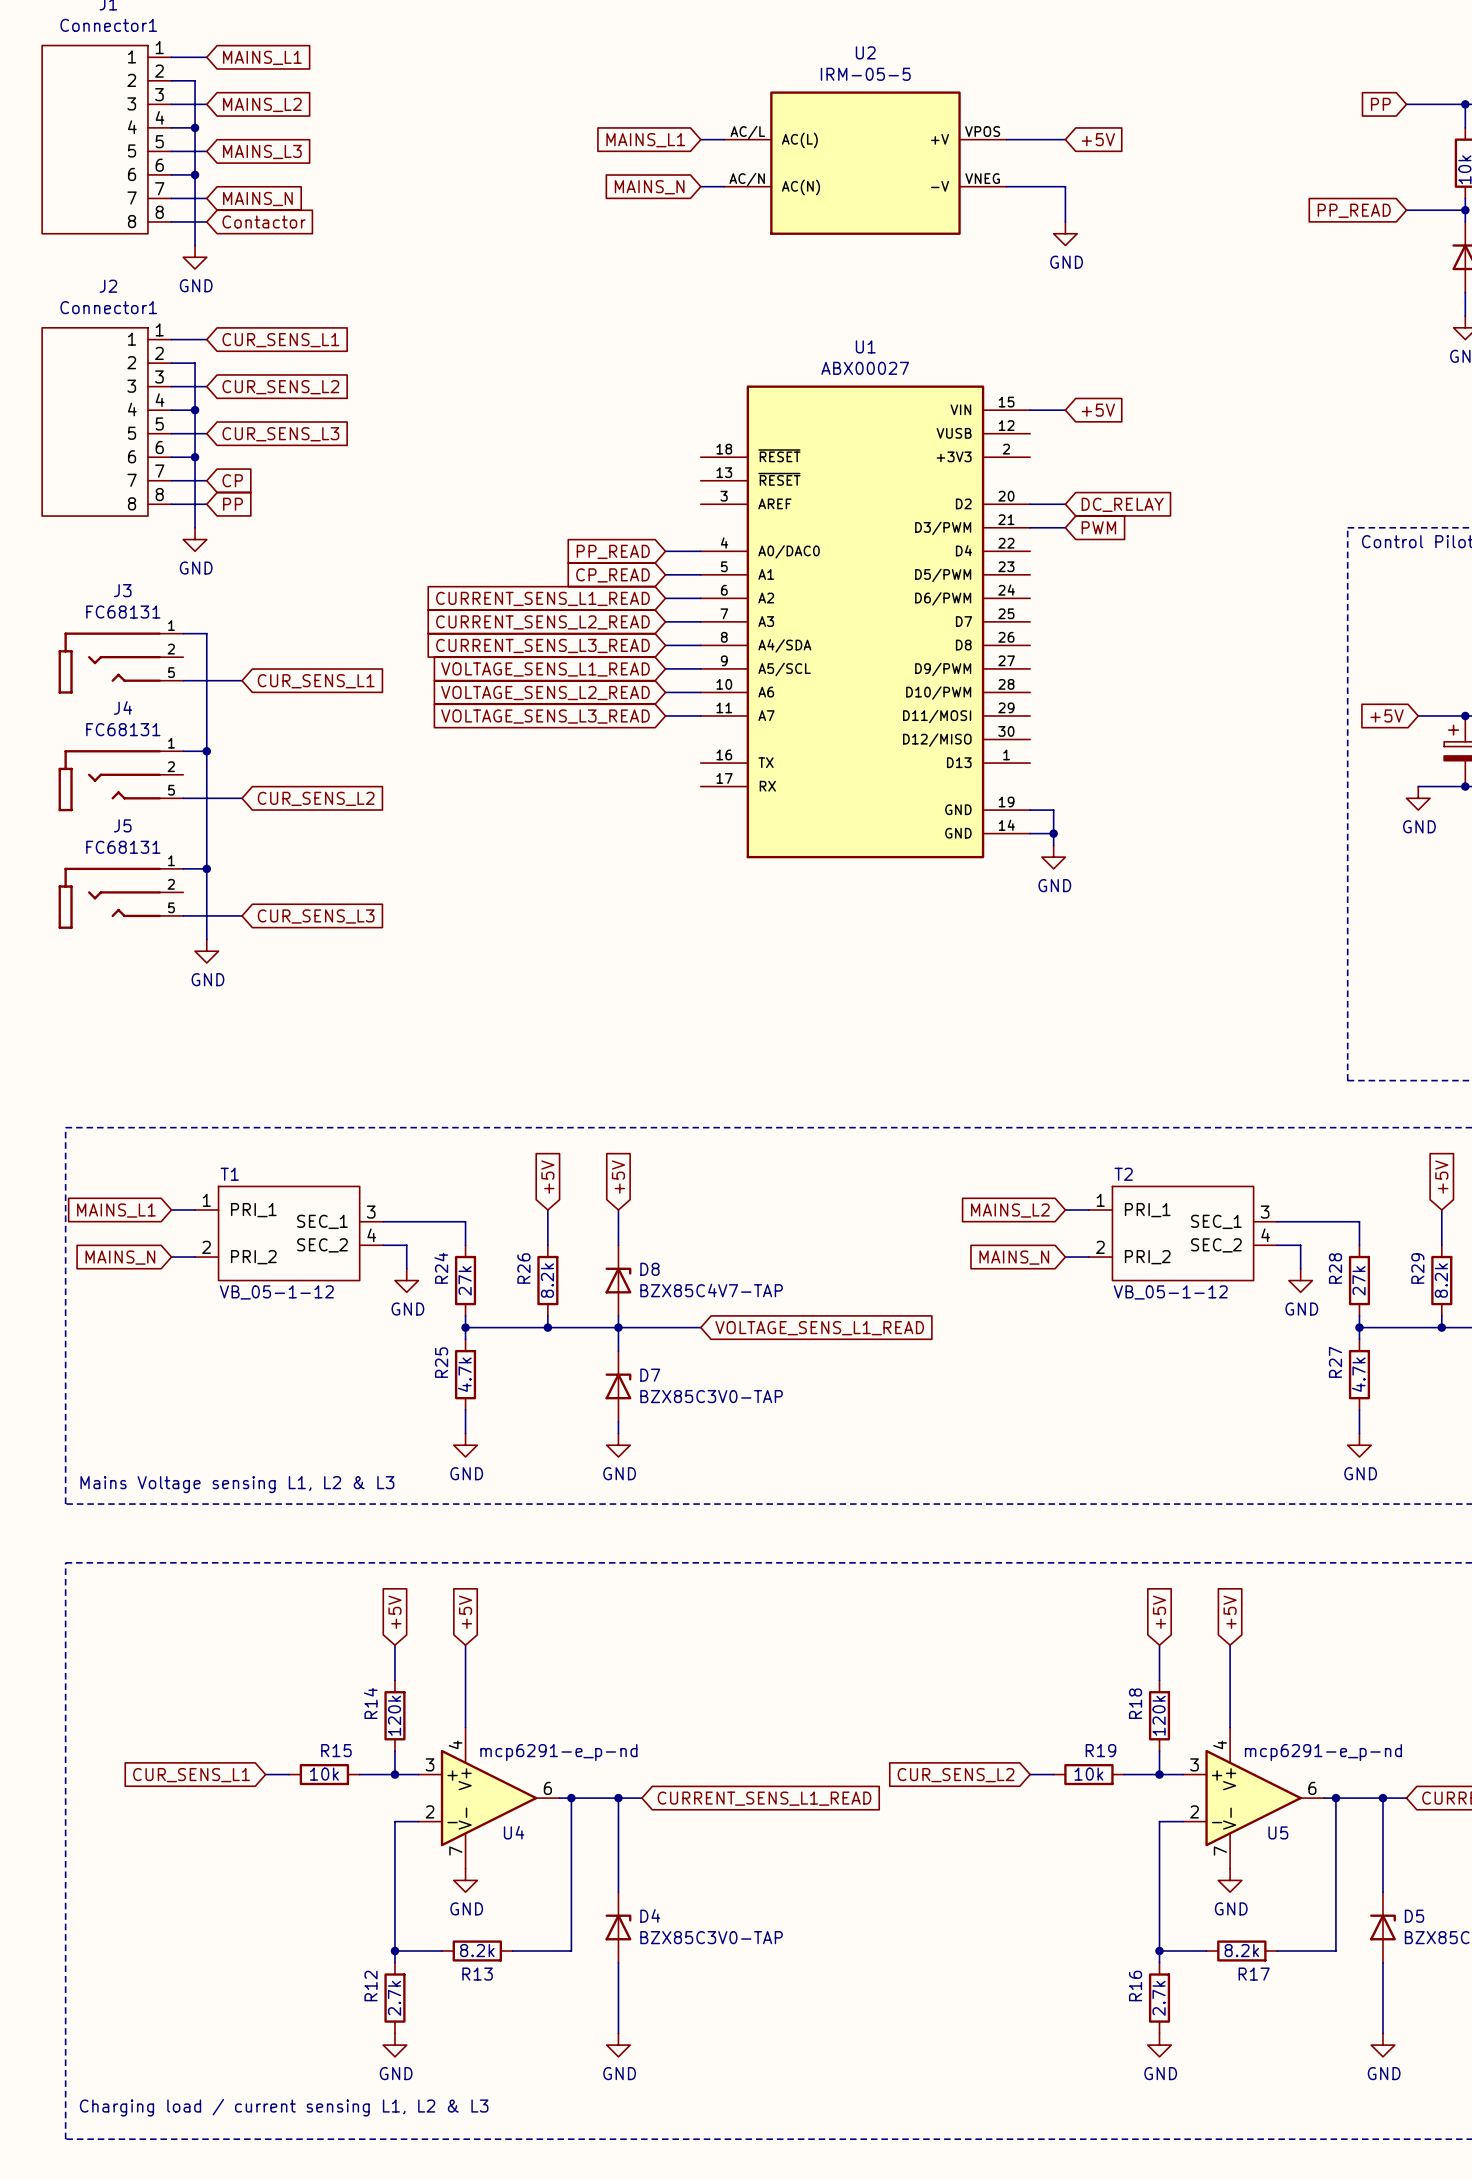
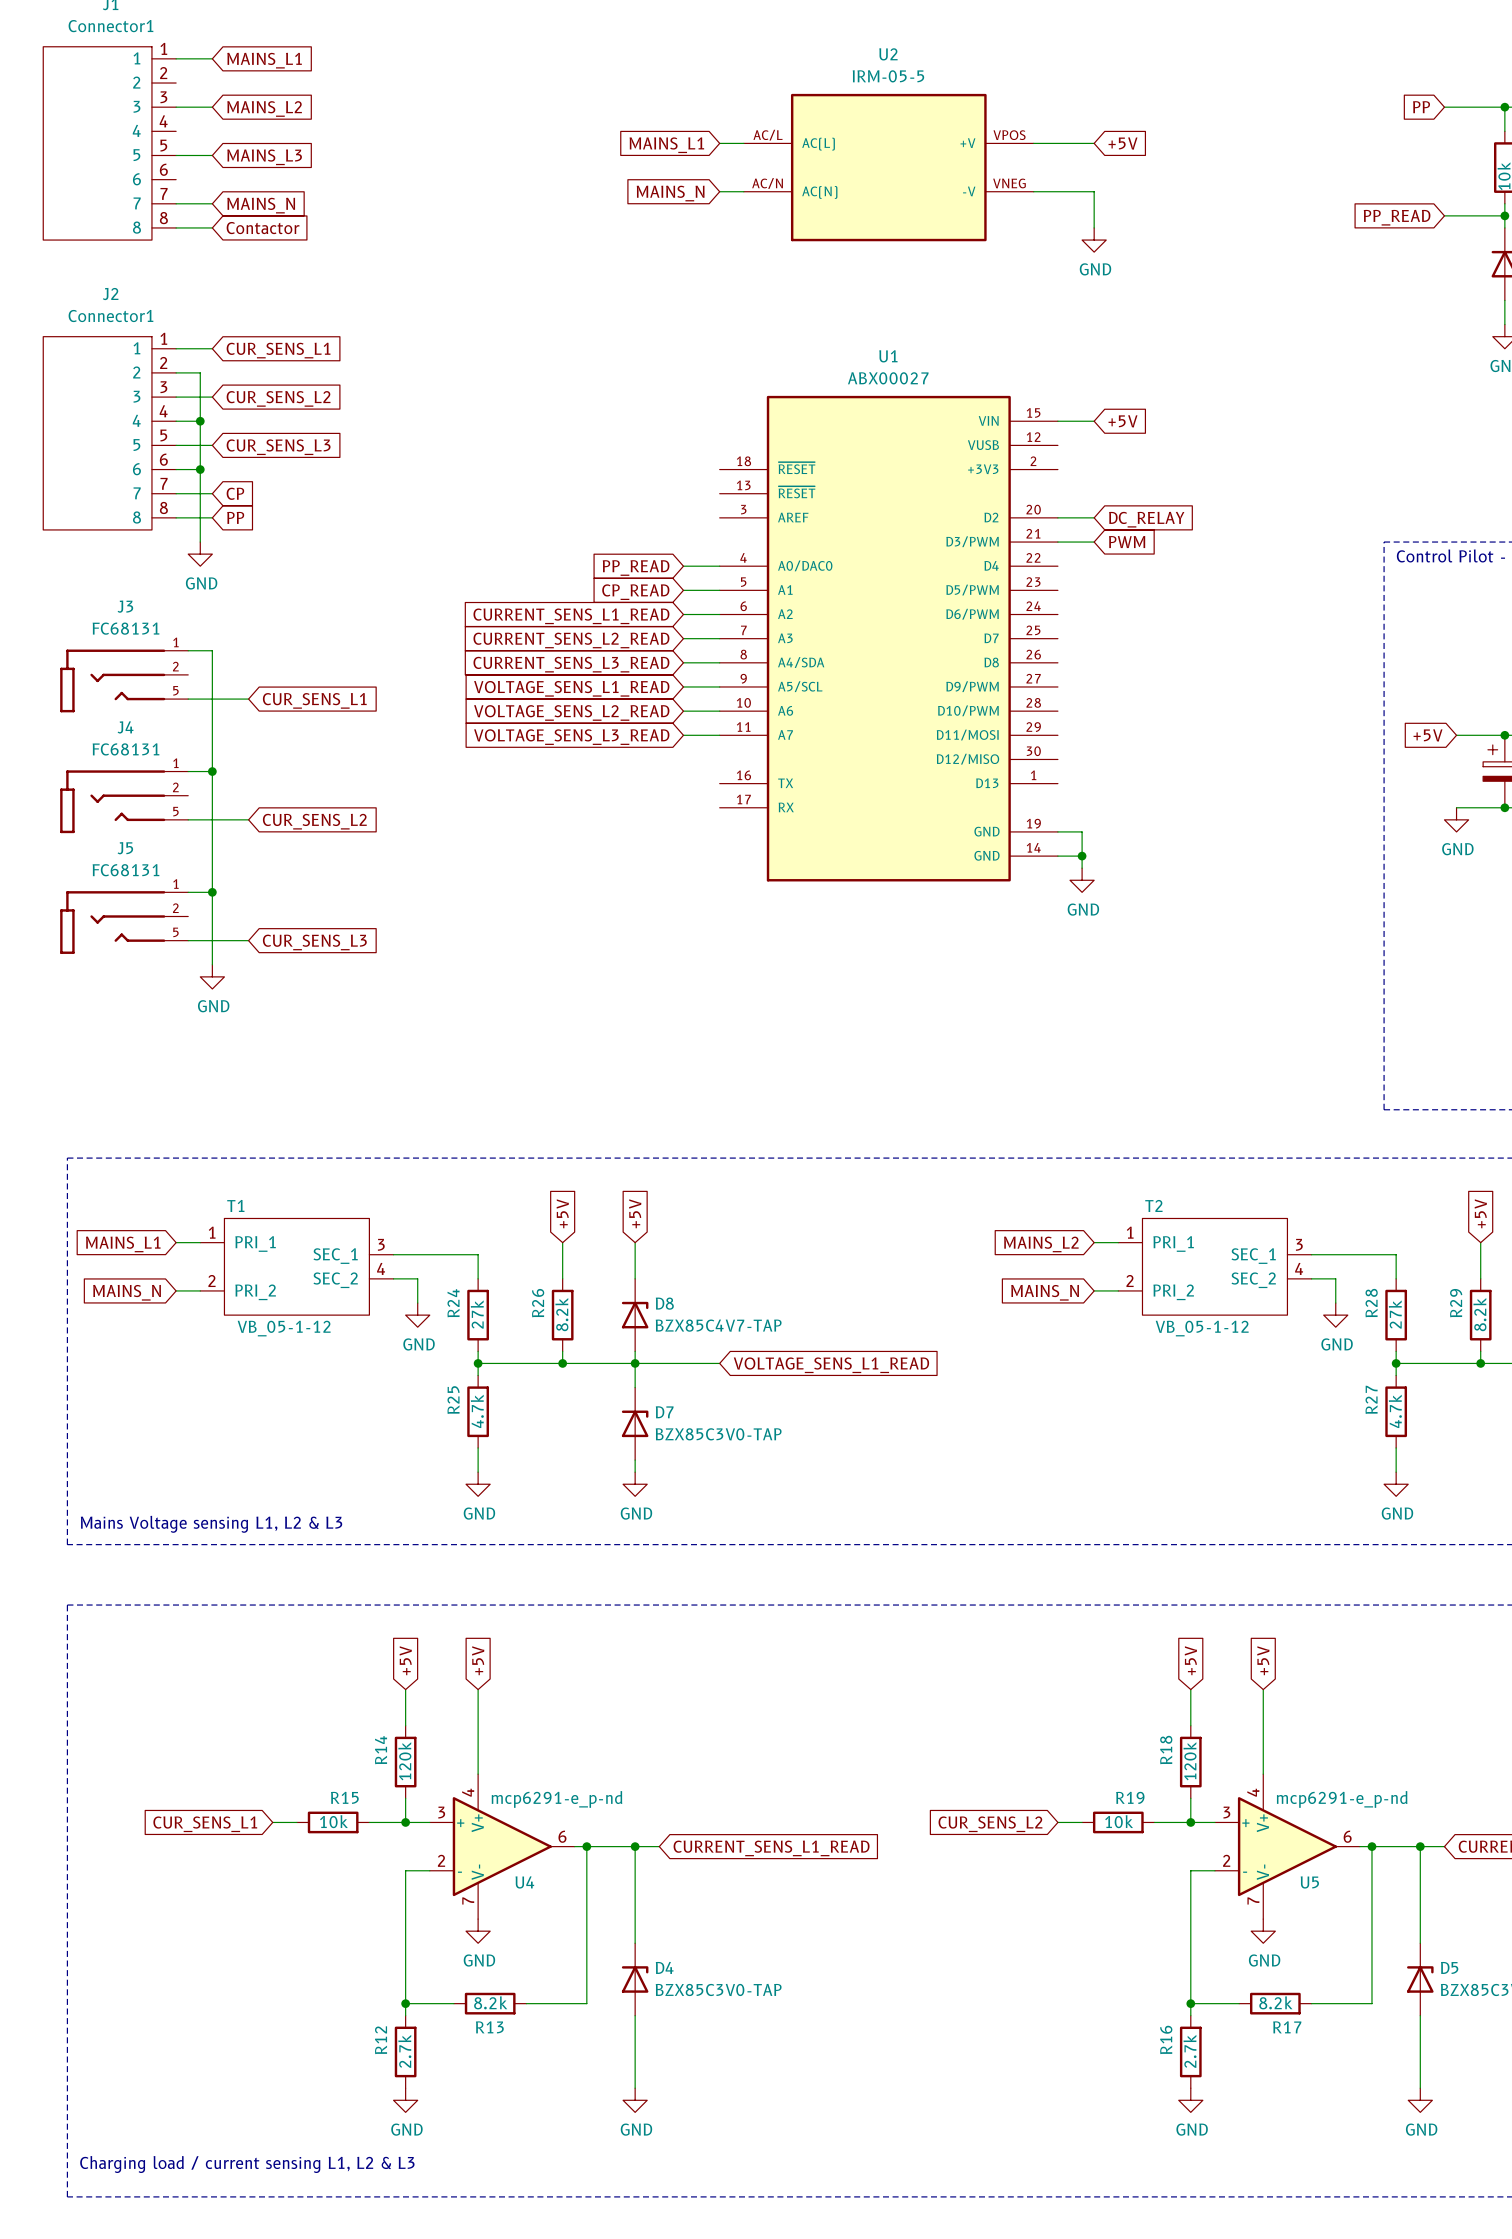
wire: (171, 80) (195, 80) (195, 245) -> none
wire: (171, 127) (195, 127) -> none
junction: (195, 127) -> none
wire: (171, 174) (195, 174) -> none
junction: (195, 174) -> none
power symbol: GND (195, 257) -> none

